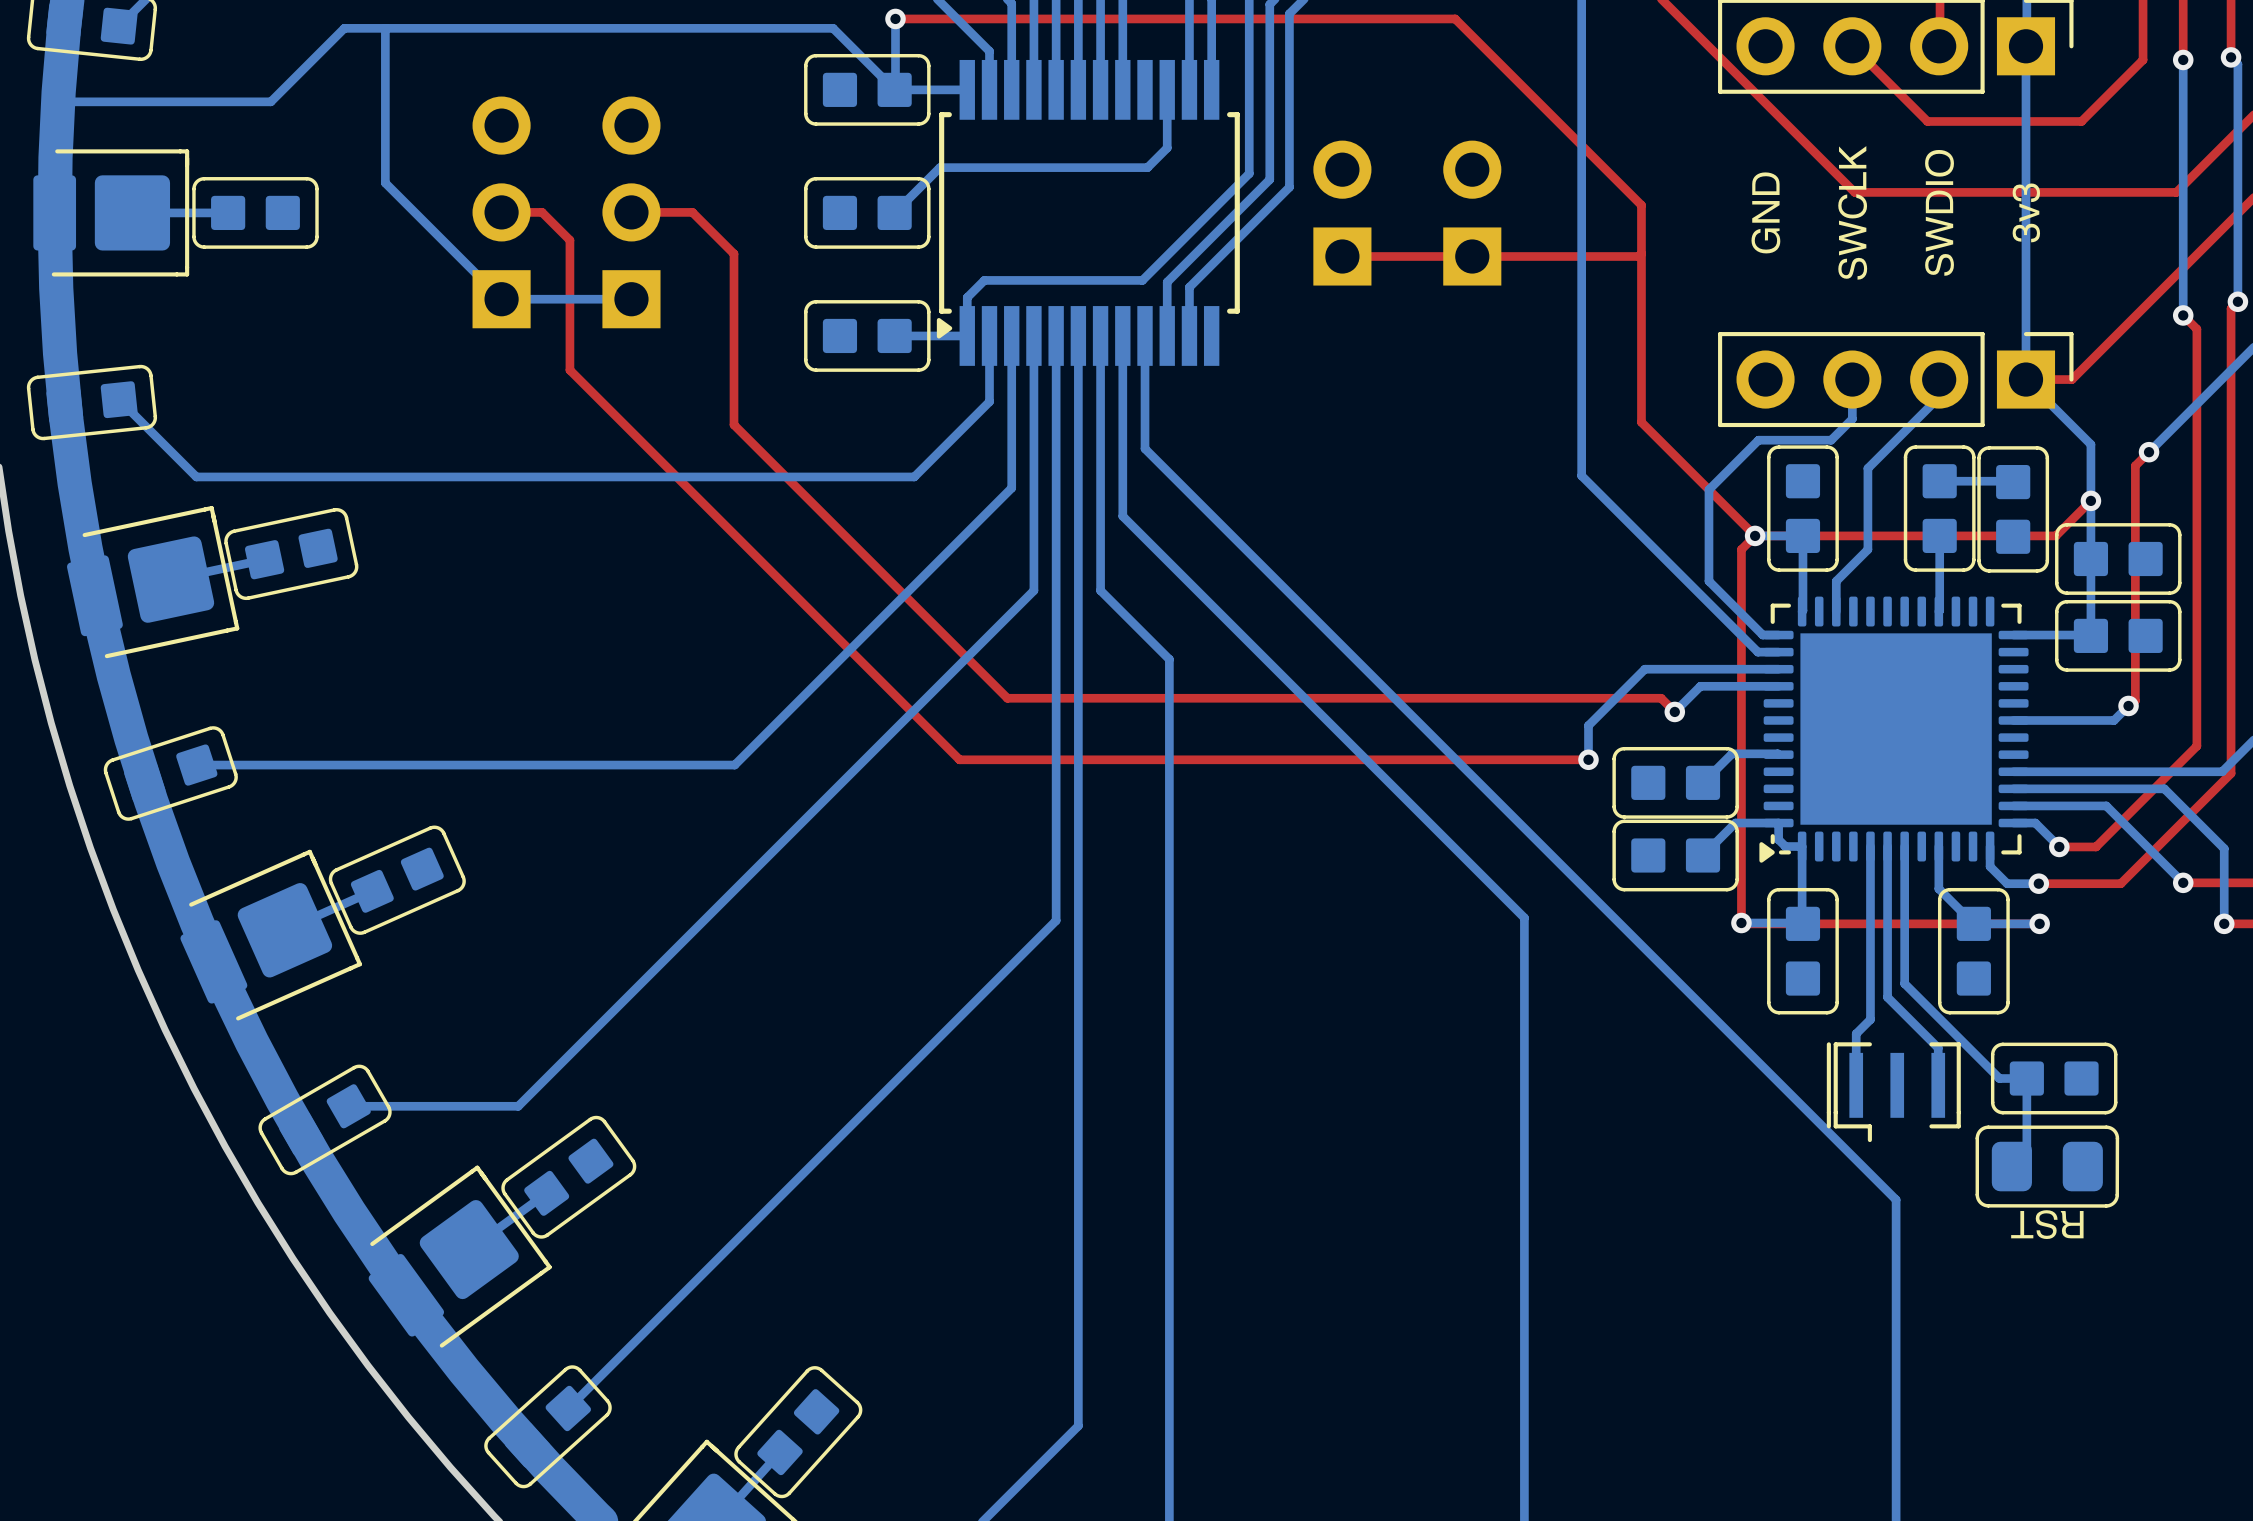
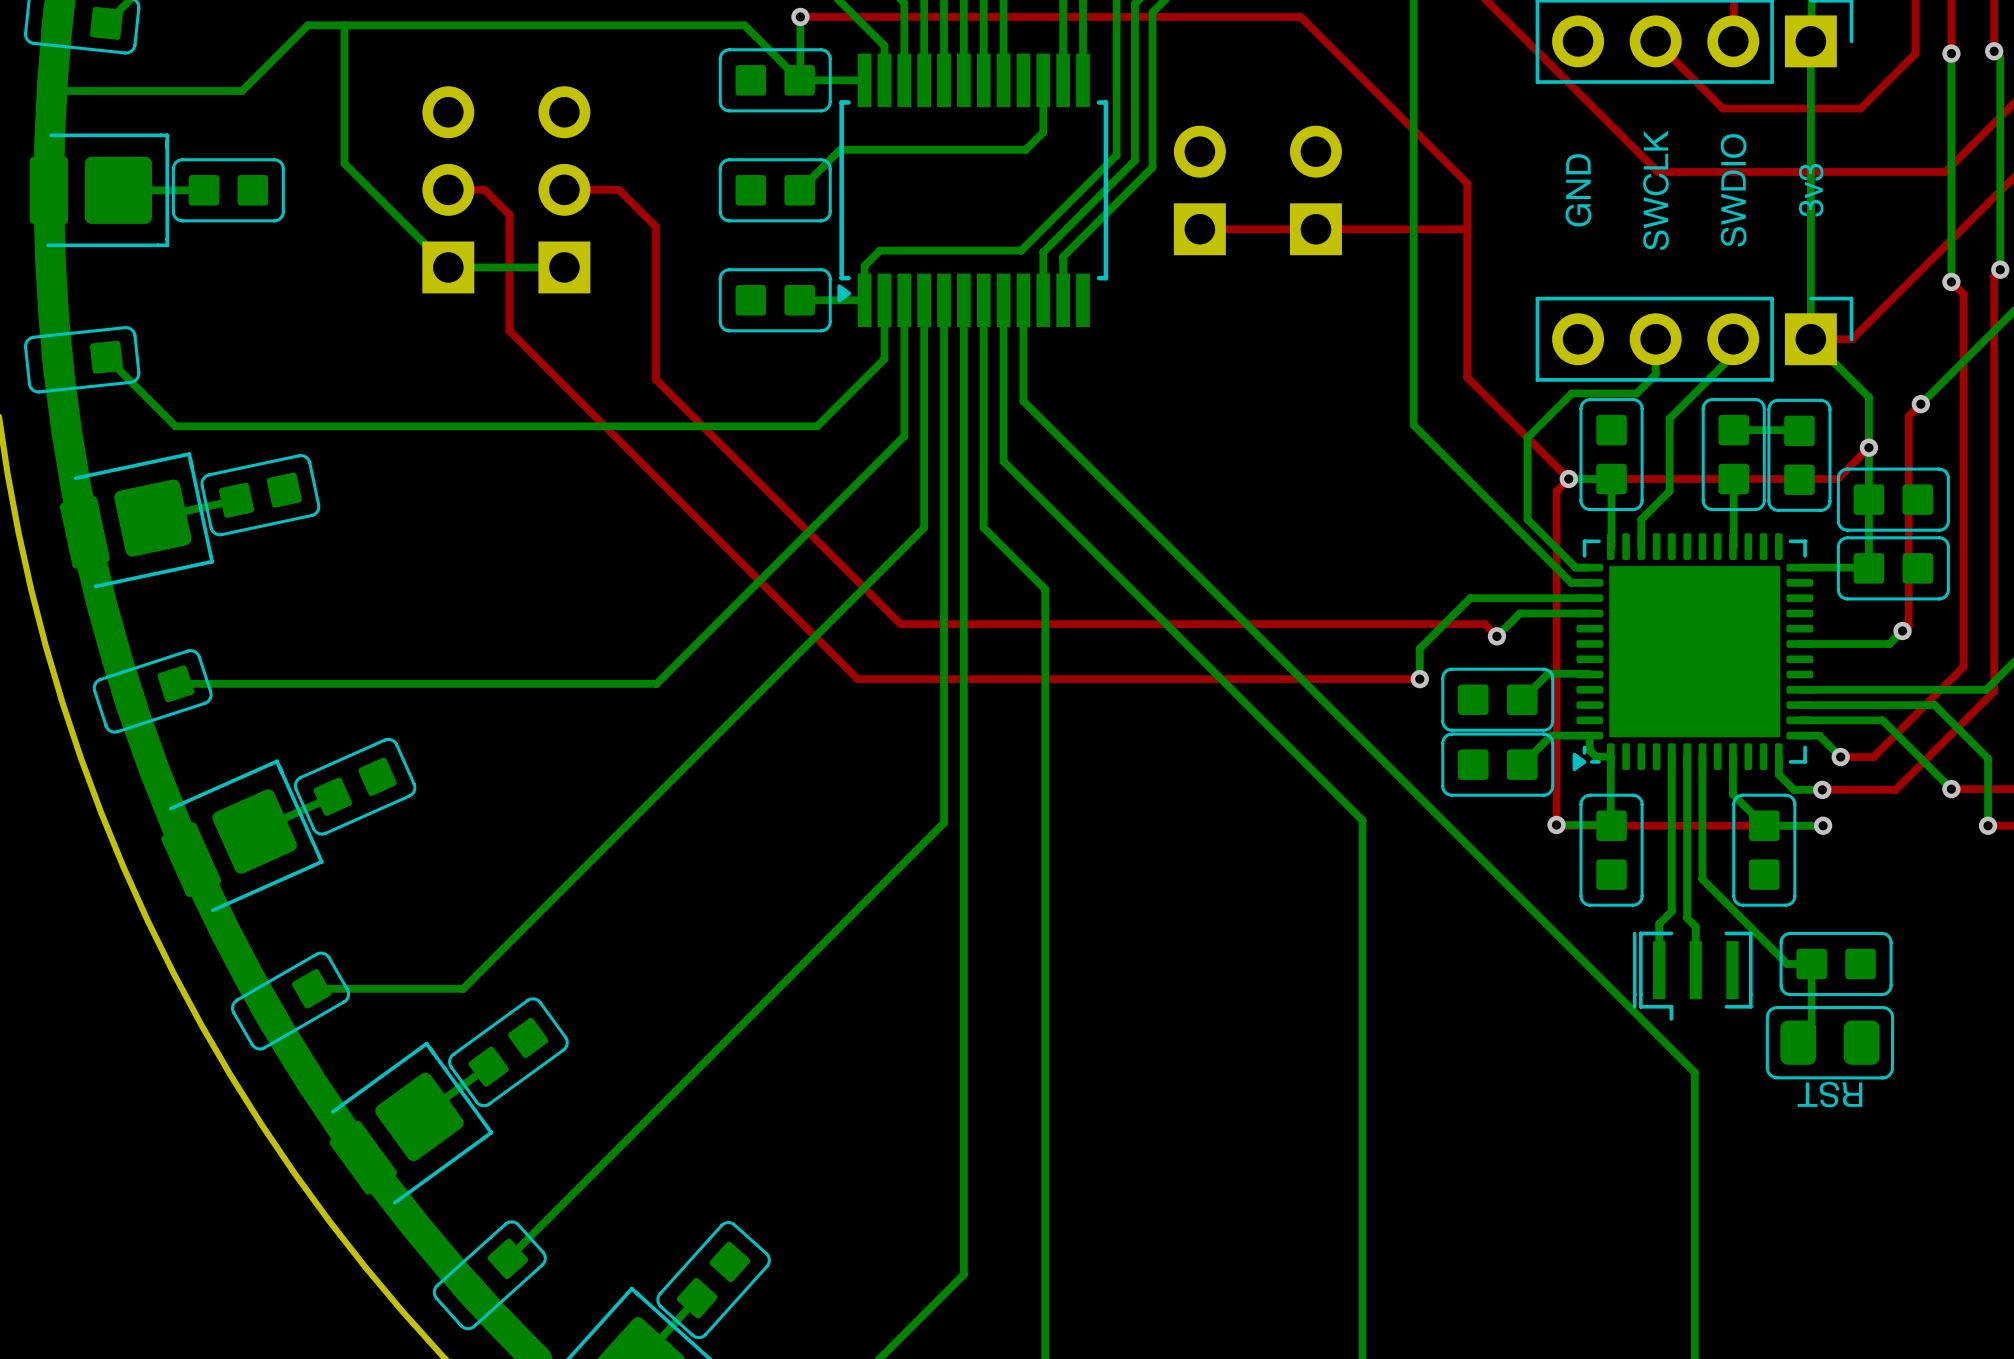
bottom track: (1887, 997) (1938, 1048) (1938, 1085) -> (1687, 891) (1687, 918) (1695, 926) (1695, 970)

